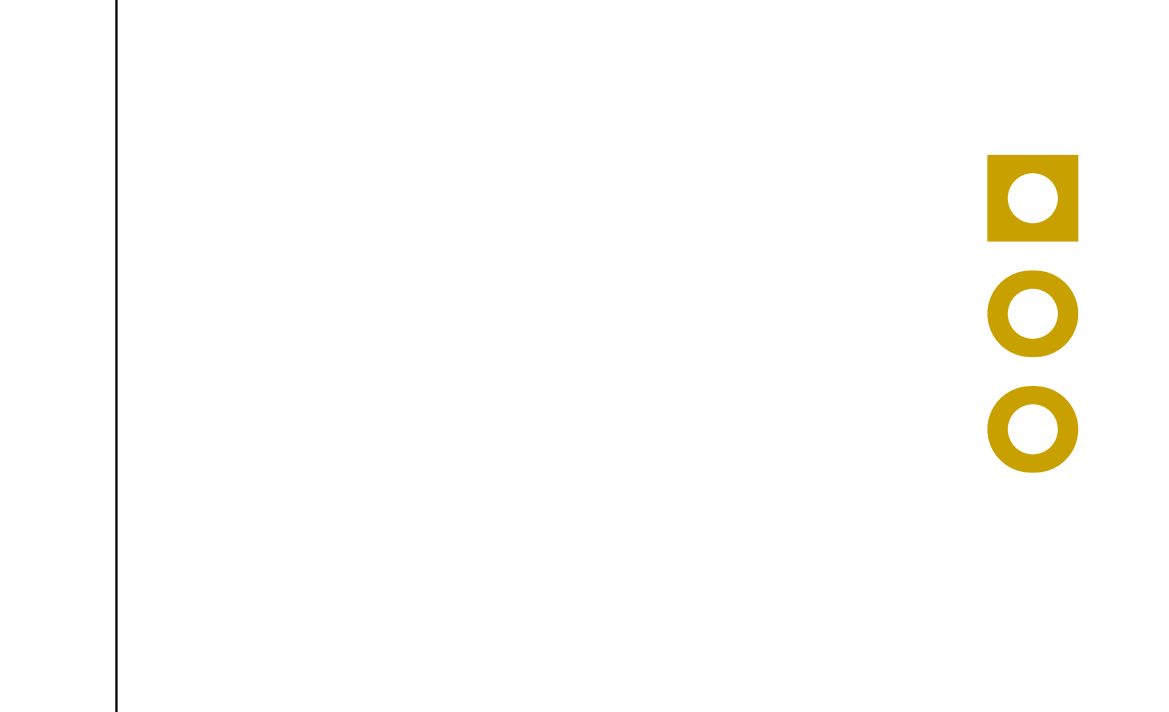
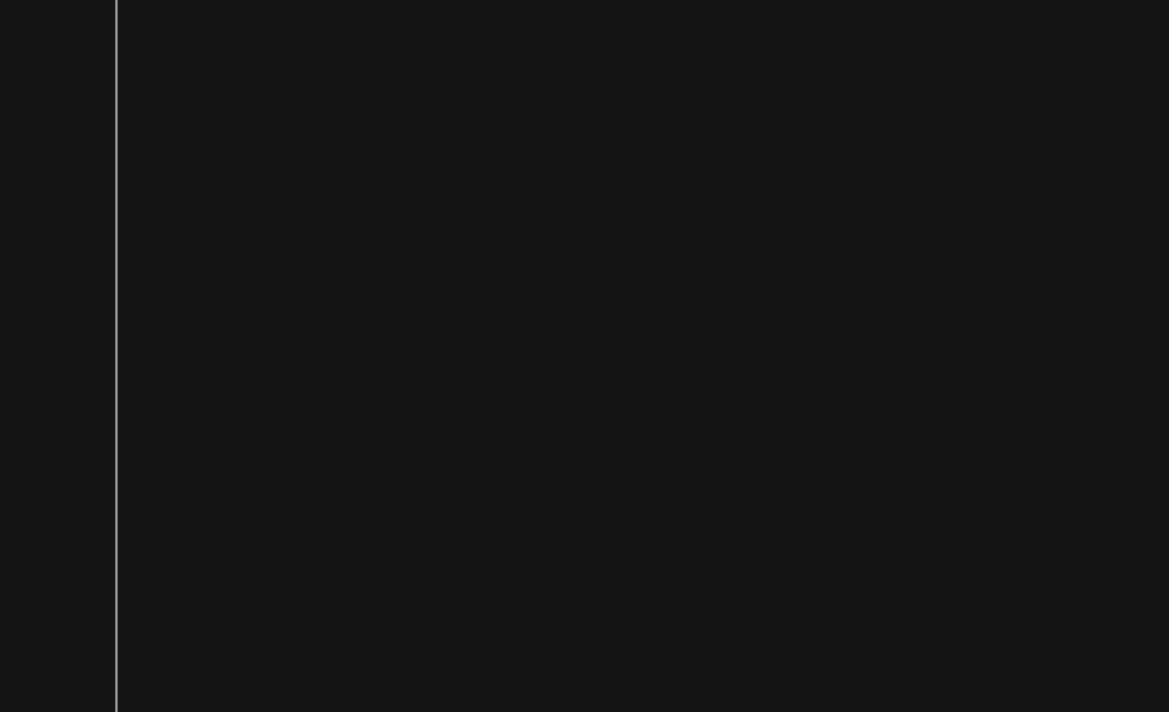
part: (1032, 313) -> none

